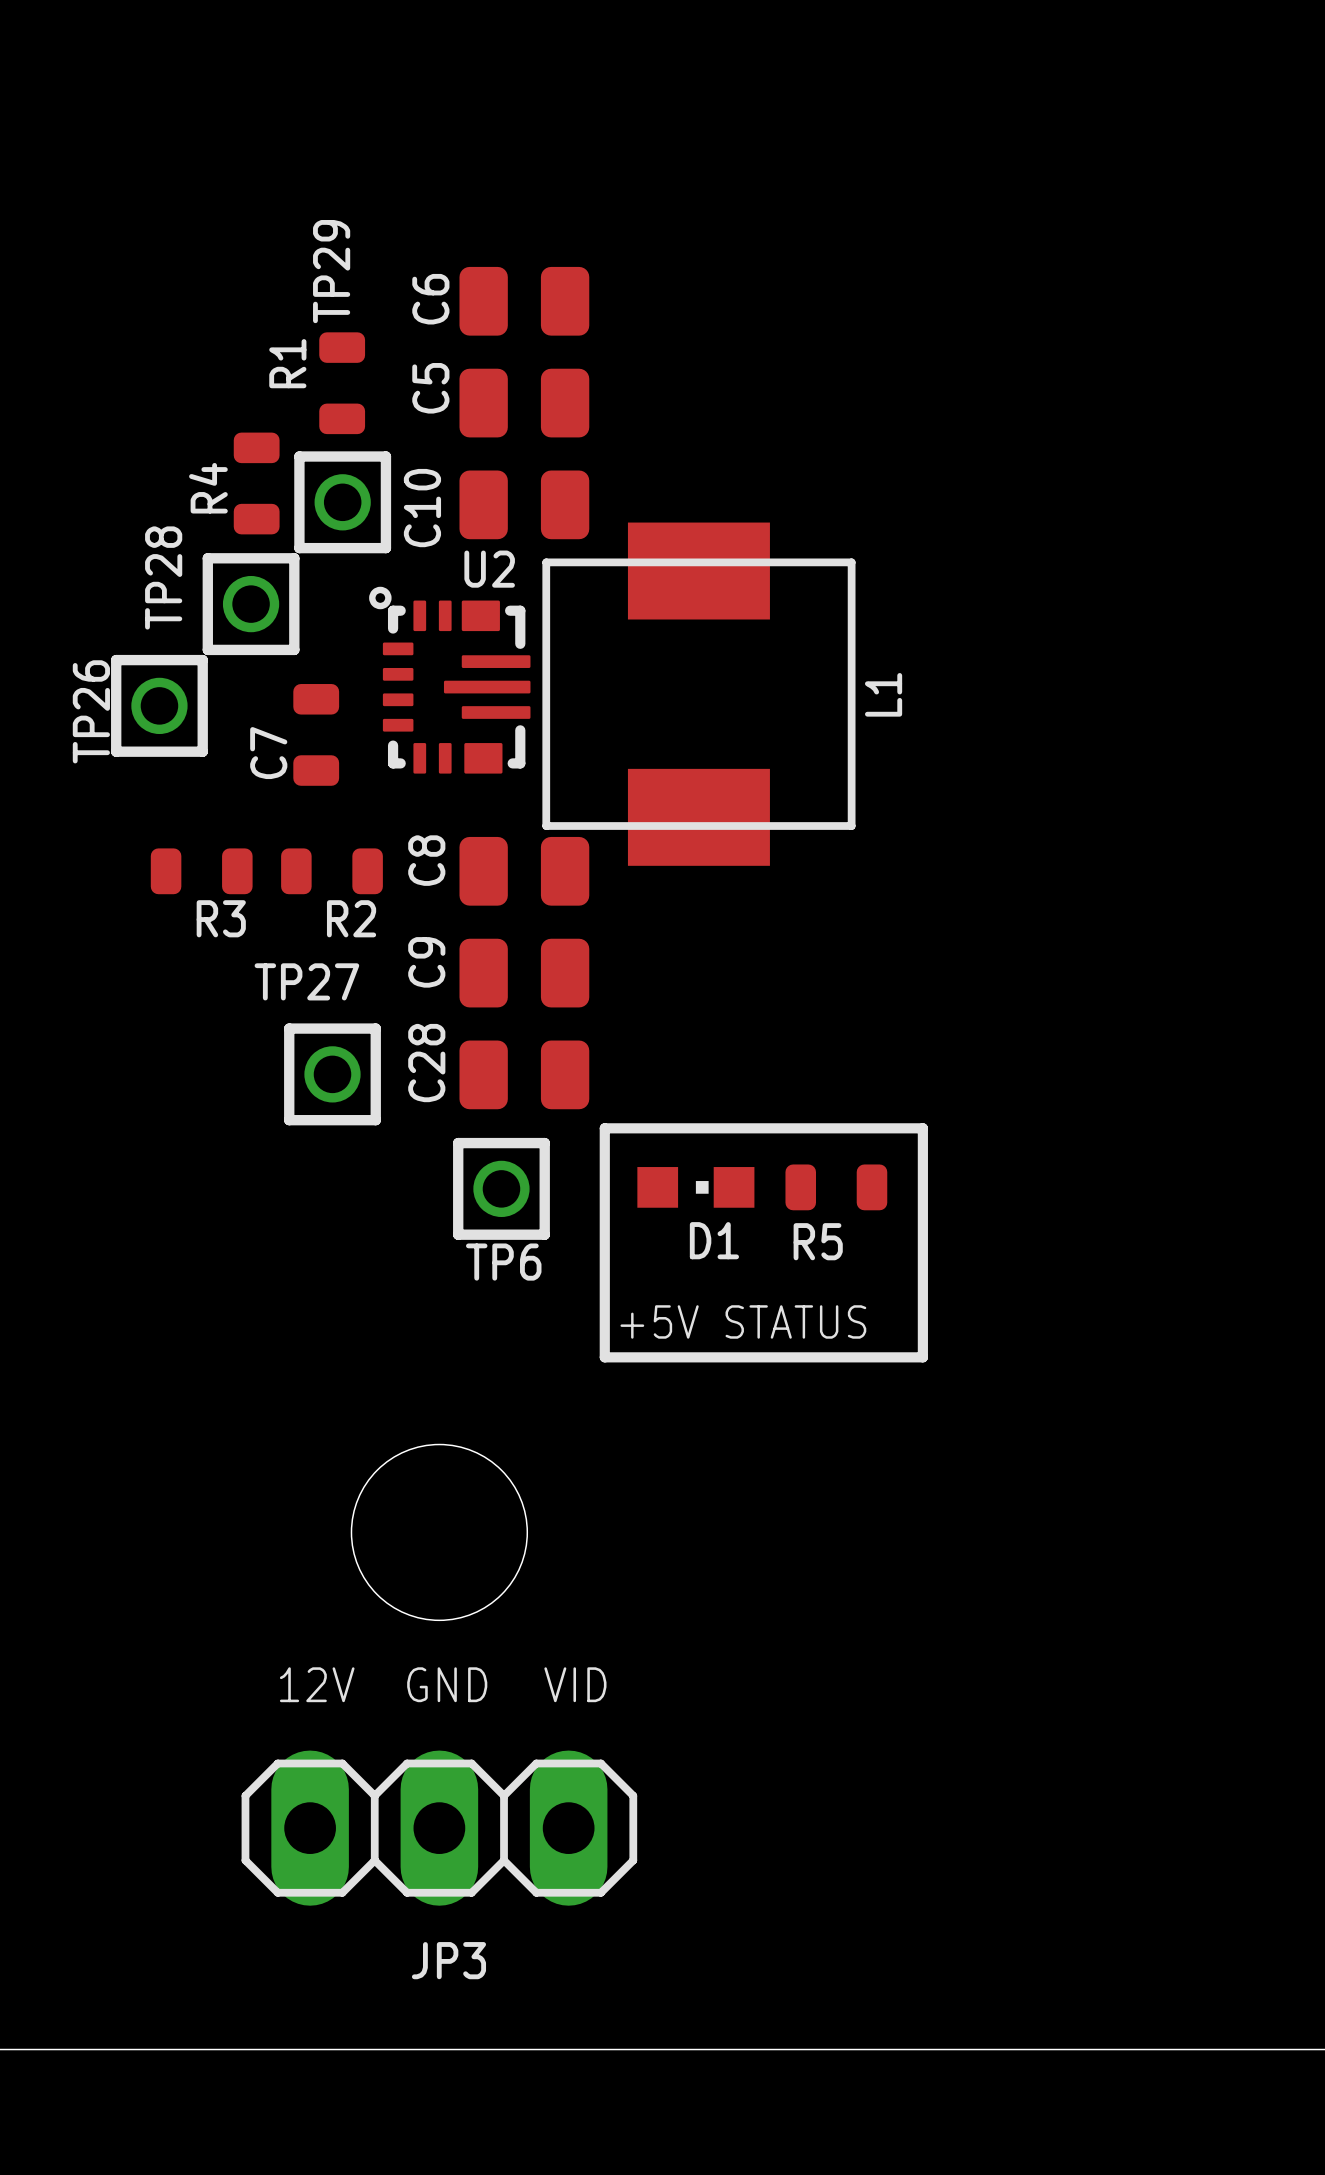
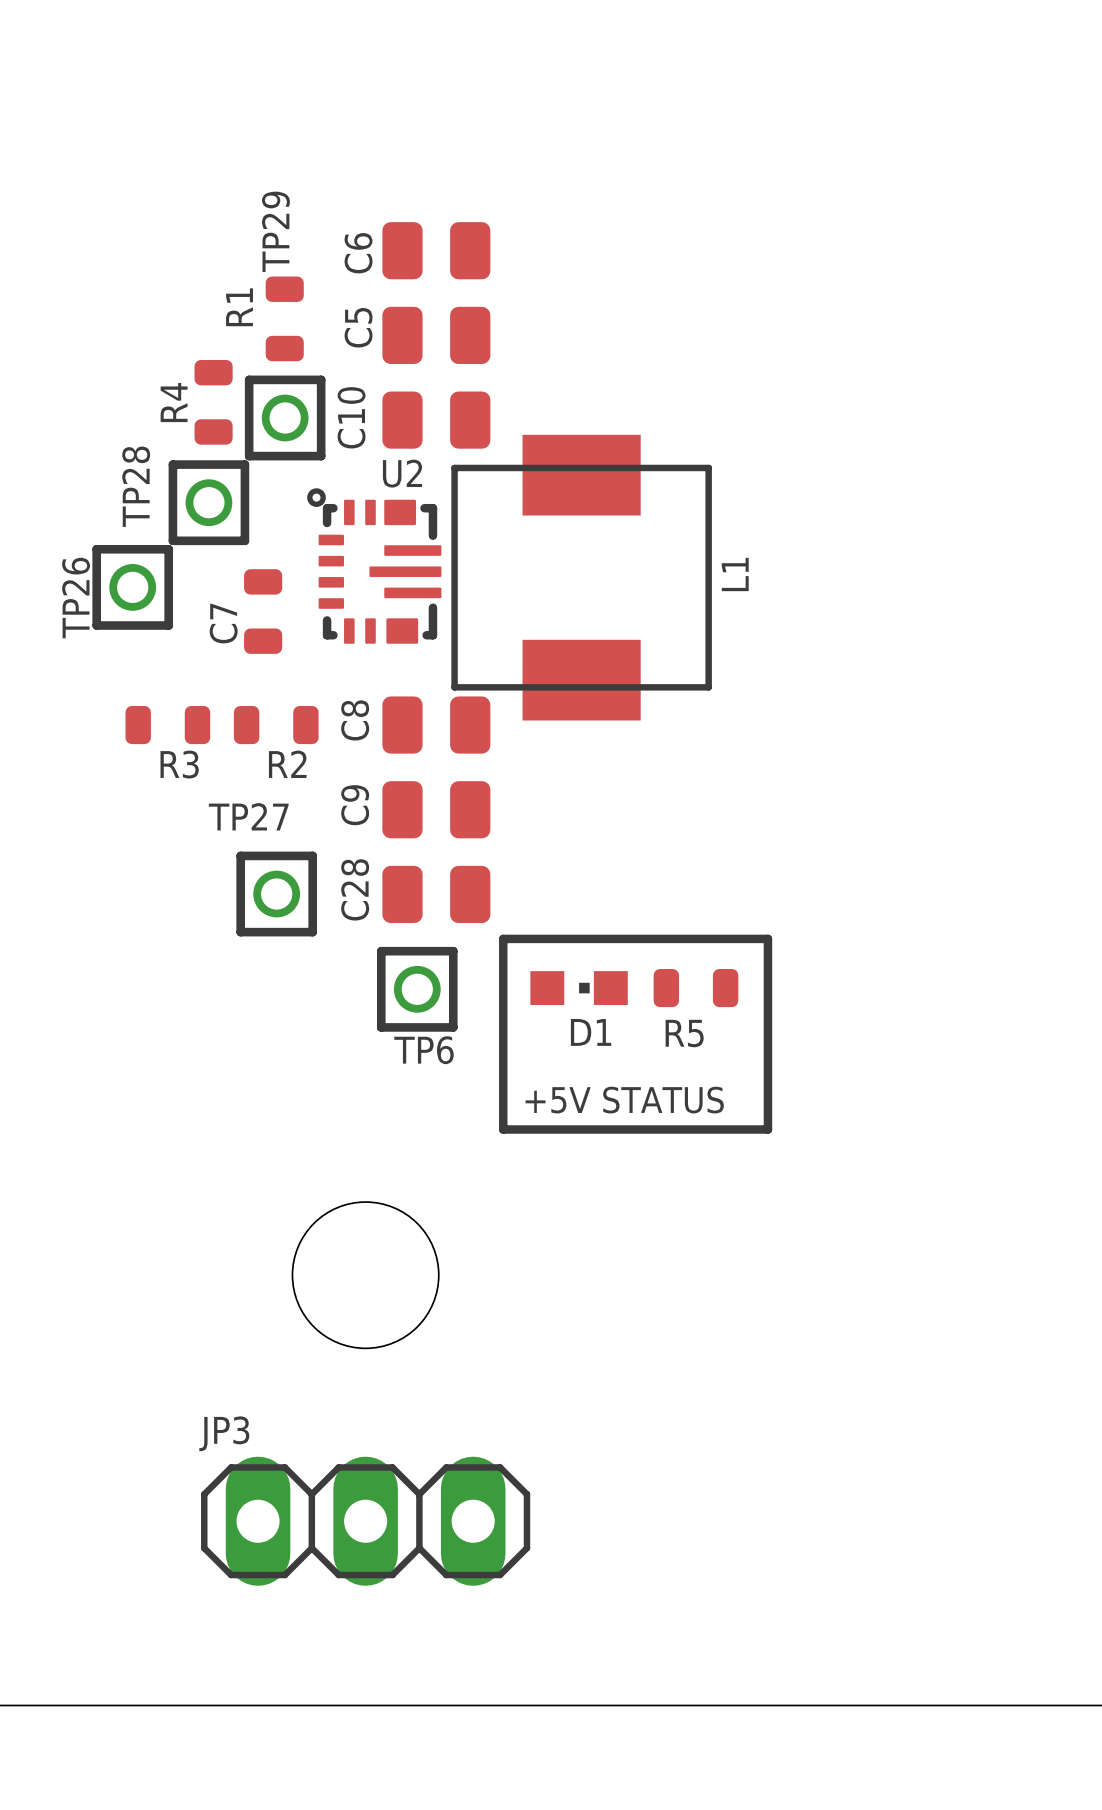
text: 12V (317, 1684) -> none
text: GND (447, 1684) -> none
text: VID (575, 1684) -> none
JP3 name position: JP3 (448, 1960) -> JP3 (224, 1433)

